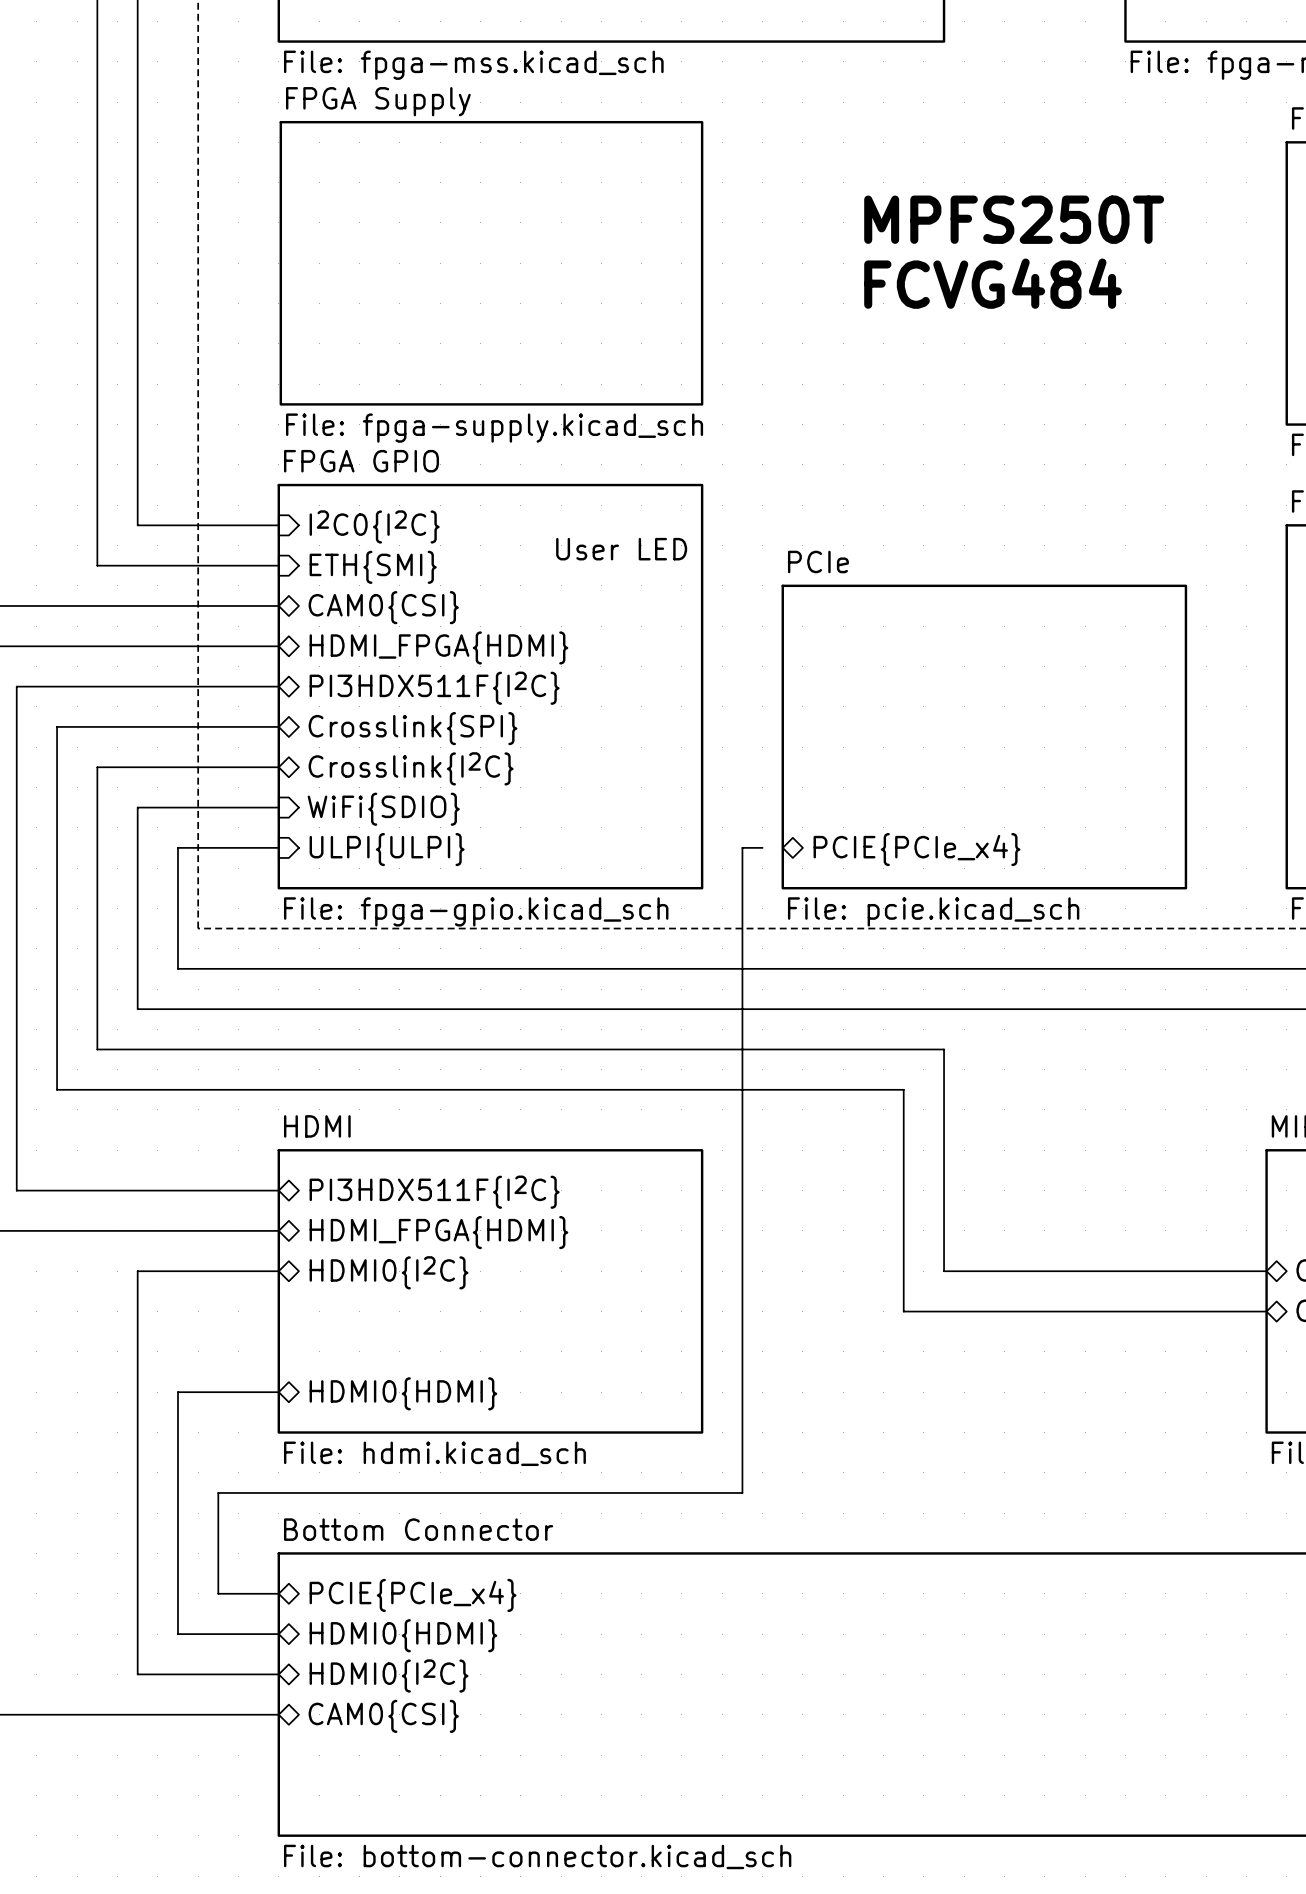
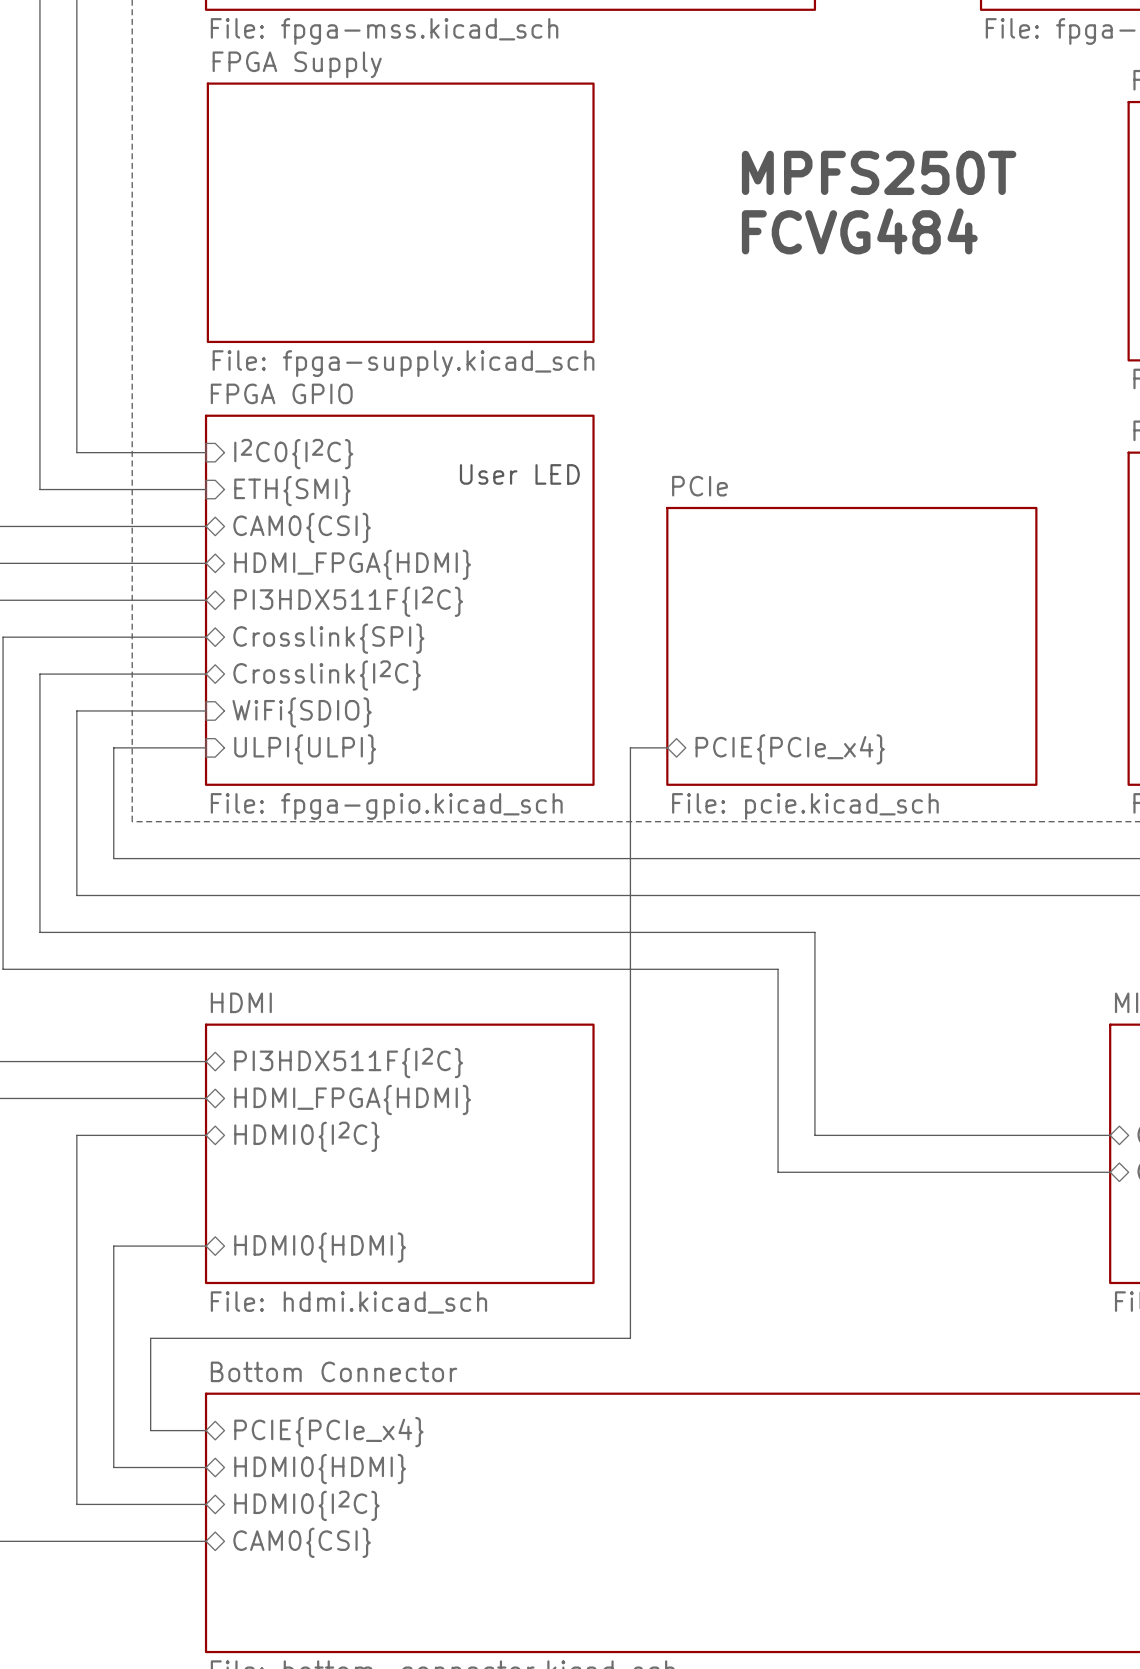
bus: none -> (648, 747) (667, 747)

